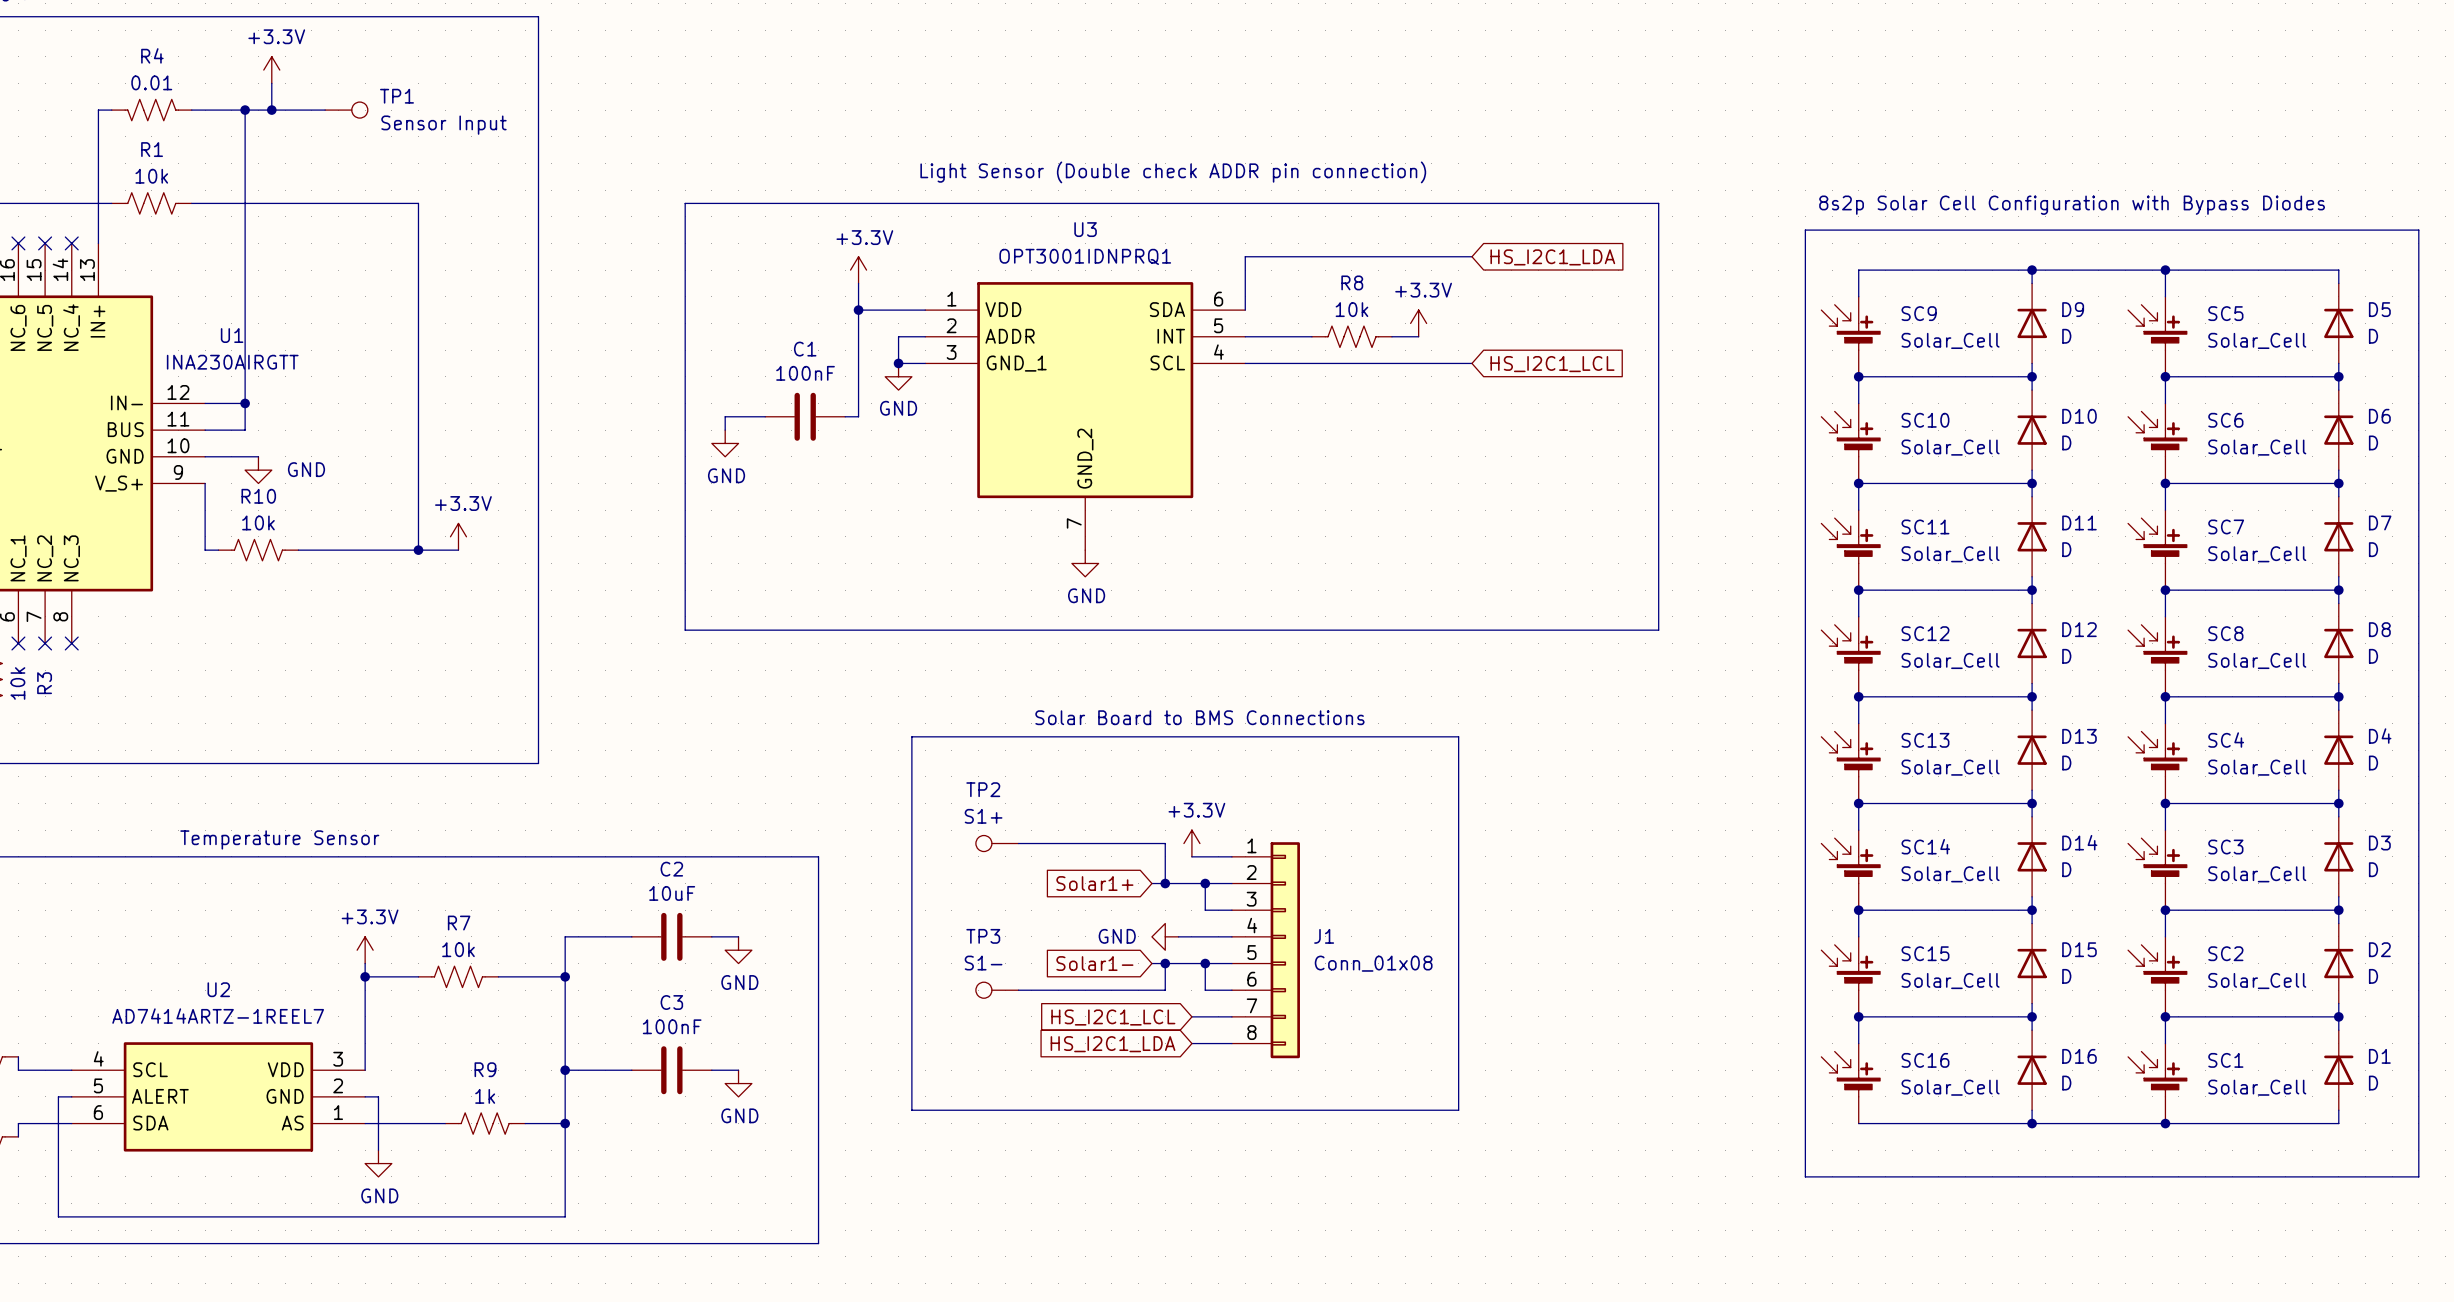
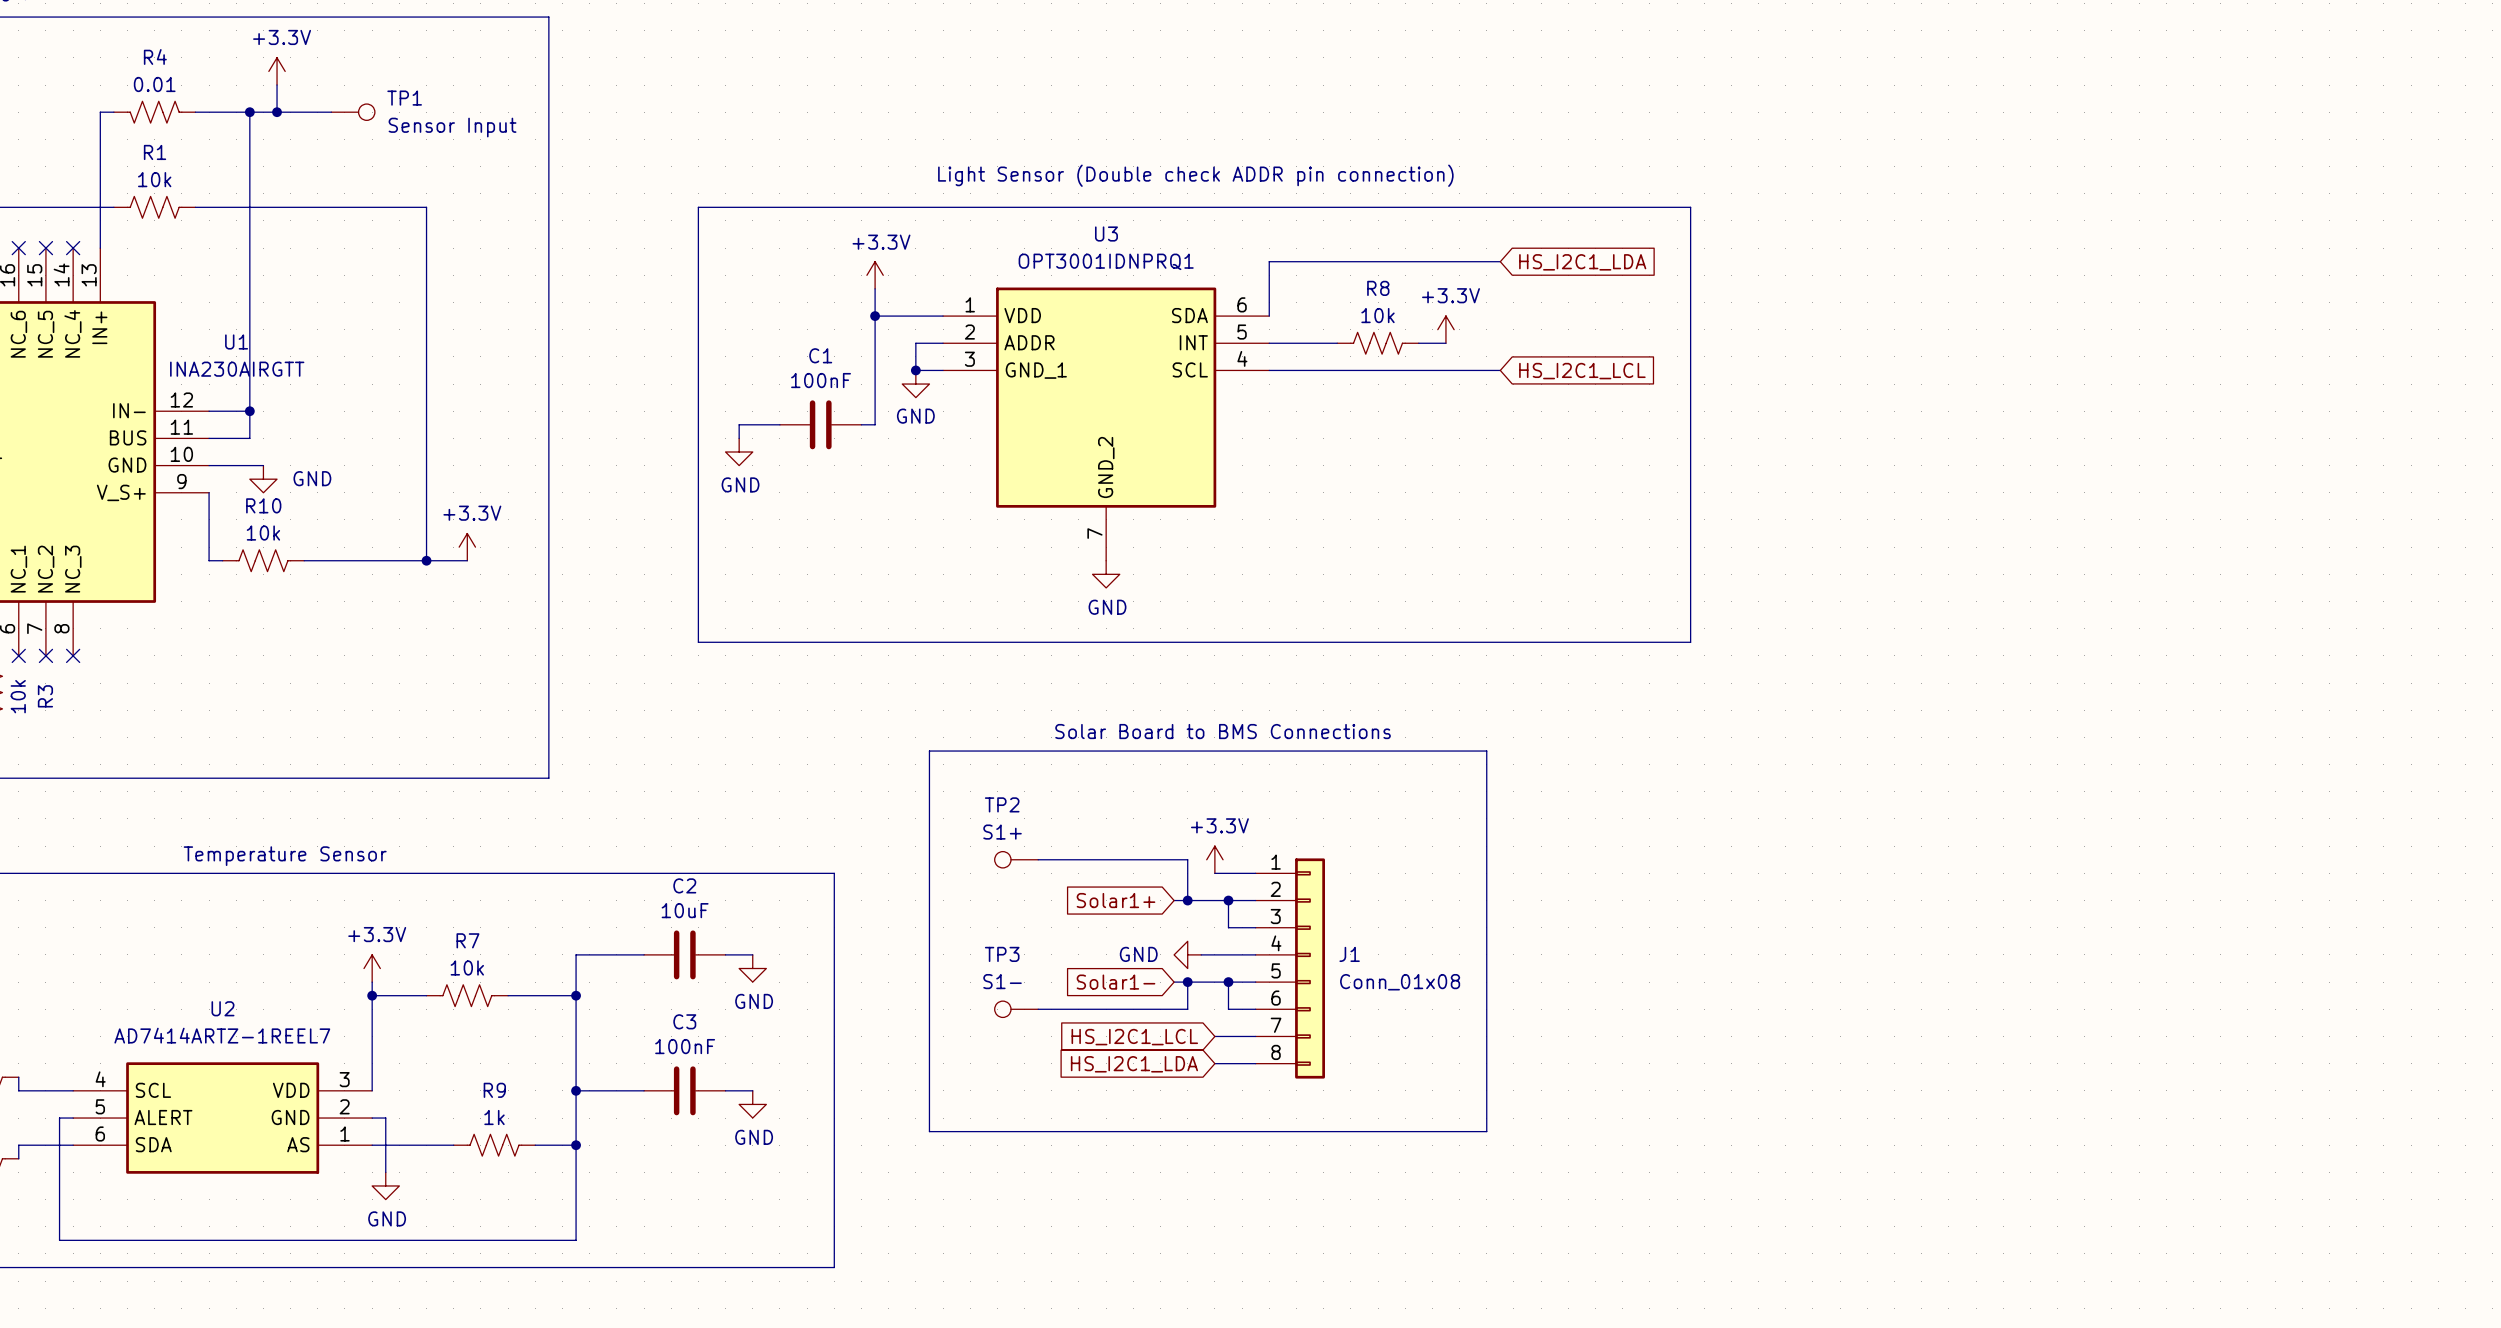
text: 8s2p Solar Cell Configuration with Bypass Diodes (2072, 205) -> none
line: (1805, 230) (2418, 230) (2418, 1176) (1805, 1176) (1805, 230) -> none
wire: (2032, 270) (2032, 283) -> none
junction: (2032, 270) -> none
wire: (2165, 270) (2165, 296) -> none
junction: (2165, 270) -> none
wire: (2338, 283) (2338, 270) (1858, 270) (1858, 296) -> none
D9: D (2032, 323) -> none
D5: D (2338, 323) -> none
SC9: Solar_Cell (1850, 336) -> none
SC5: Solar_Cell (2157, 336) -> none
wire: (2032, 363) (2032, 390) -> none
wire: (2338, 363) (2338, 390) -> none
junction: (1858, 376) -> none
wire: (2032, 376) (1858, 376) (1858, 403) -> none
junction: (2032, 376) -> none
junction: (2165, 376) -> none
wire: (2338, 376) (2165, 376) (2165, 403) -> none
junction: (2338, 376) -> none
D10: D (2032, 430) -> none
D6: D (2338, 430) -> none
SC10: Solar_Cell (1850, 443) -> none
SC6: Solar_Cell (2157, 443) -> none
wire: (2032, 470) (2032, 496) -> none
wire: (2338, 470) (2338, 496) -> none
junction: (1858, 483) -> none
wire: (2032, 483) (1858, 483) (1858, 510) -> none
junction: (2032, 483) -> none
junction: (2165, 483) -> none
wire: (2338, 483) (2165, 483) (2165, 510) -> none
junction: (2338, 483) -> none
D11: D (2032, 536) -> none
D7: D (2338, 536) -> none
SC11: Solar_Cell (1850, 550) -> none
SC7: Solar_Cell (2157, 550) -> none
wire: (2032, 576) (2032, 603) -> none
wire: (2338, 576) (2338, 603) -> none
junction: (1858, 590) -> none
wire: (2032, 590) (1858, 590) (1858, 616) -> none
junction: (2032, 590) -> none
junction: (2165, 590) -> none
wire: (2338, 590) (2165, 590) (2165, 616) -> none
junction: (2338, 590) -> none
D12: D (2032, 643) -> none
D8: D (2338, 643) -> none
SC12: Solar_Cell (1850, 656) -> none
SC8: Solar_Cell (2157, 656) -> none
wire: (2032, 683) (2032, 710) -> none
wire: (2338, 683) (2338, 710) -> none
junction: (1858, 696) -> none
wire: (2032, 696) (1858, 696) (1858, 723) -> none
junction: (2032, 696) -> none
junction: (2165, 696) -> none
wire: (2338, 696) (2165, 696) (2165, 723) -> none
junction: (2338, 696) -> none
D13: D (2032, 750) -> none
D4: D (2338, 750) -> none
SC13: Solar_Cell (1850, 763) -> none
SC4: Solar_Cell (2157, 763) -> none
wire: (2032, 790) (2032, 816) -> none
wire: (2338, 790) (2338, 816) -> none
junction: (1858, 803) -> none
wire: (2032, 803) (1858, 803) (1858, 830) -> none
junction: (2032, 803) -> none
junction: (2165, 803) -> none
wire: (2338, 803) (2165, 803) (2165, 830) -> none
junction: (2338, 803) -> none
D14: D (2032, 856) -> none
D3: D (2338, 856) -> none
SC14: Solar_Cell (1850, 870) -> none
SC3: Solar_Cell (2157, 870) -> none
wire: (2032, 896) (2032, 923) -> none
wire: (2338, 896) (2338, 923) -> none
junction: (1858, 910) -> none
wire: (2032, 910) (1858, 910) (1858, 936) -> none
junction: (2032, 910) -> none
junction: (2165, 910) -> none
wire: (2338, 910) (2165, 910) (2165, 936) -> none
junction: (2338, 910) -> none
D15: D (2032, 963) -> none
D2: D (2338, 963) -> none
SC15: Solar_Cell (1850, 976) -> none
SC2: Solar_Cell (2157, 976) -> none
wire: (2032, 1003) (2032, 1030) -> none
wire: (2338, 1003) (2338, 1030) -> none
junction: (1858, 1016) -> none
wire: (2032, 1016) (1858, 1016) (1858, 1043) -> none
junction: (2032, 1016) -> none
junction: (2165, 1016) -> none
wire: (2338, 1016) (2165, 1016) (2165, 1043) -> none
junction: (2338, 1016) -> none
D16: D (2032, 1070) -> none
D1: D (2338, 1070) -> none
SC16: Solar_Cell (1850, 1083) -> none
SC1: Solar_Cell (2157, 1083) -> none
wire: (2032, 1110) (2032, 1123) -> none
wire: (2338, 1110) (2338, 1123) (1858, 1123) -> none
junction: (2032, 1123) -> none
junction: (2165, 1123) -> none

